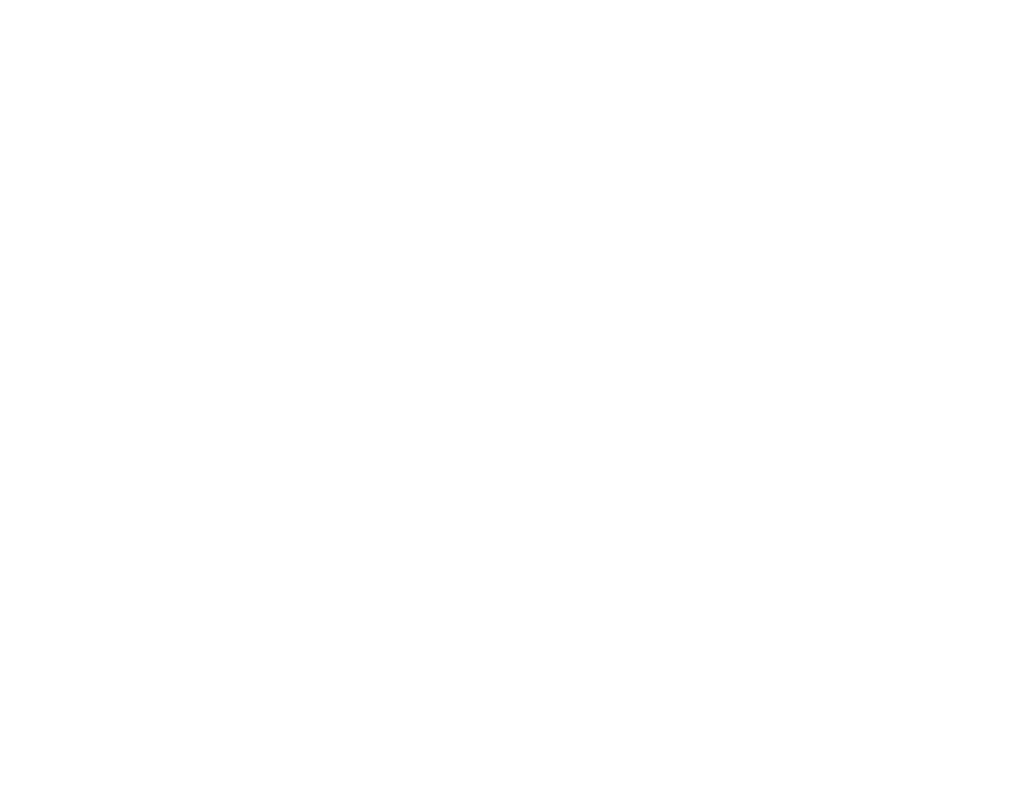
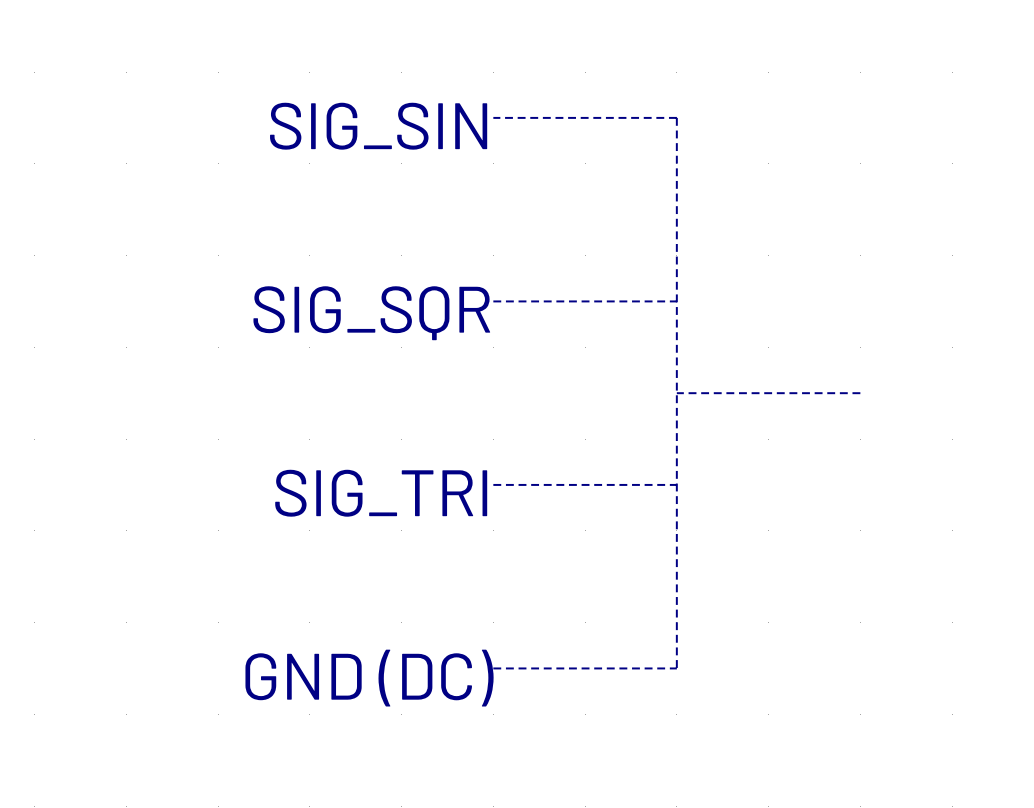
line: none -> (493, 117) (676, 117) (676, 668) (493, 668)
text: none -> SIG_SIN (378, 126)
line: none -> (493, 301) (676, 301)
text: none -> SIG_SQR (371, 313)
line: none -> (676, 393) (860, 393)
line: none -> (493, 484) (676, 484)
text: none -> SIG_TRI (381, 493)
text: none -> GND (DC) (369, 678)

